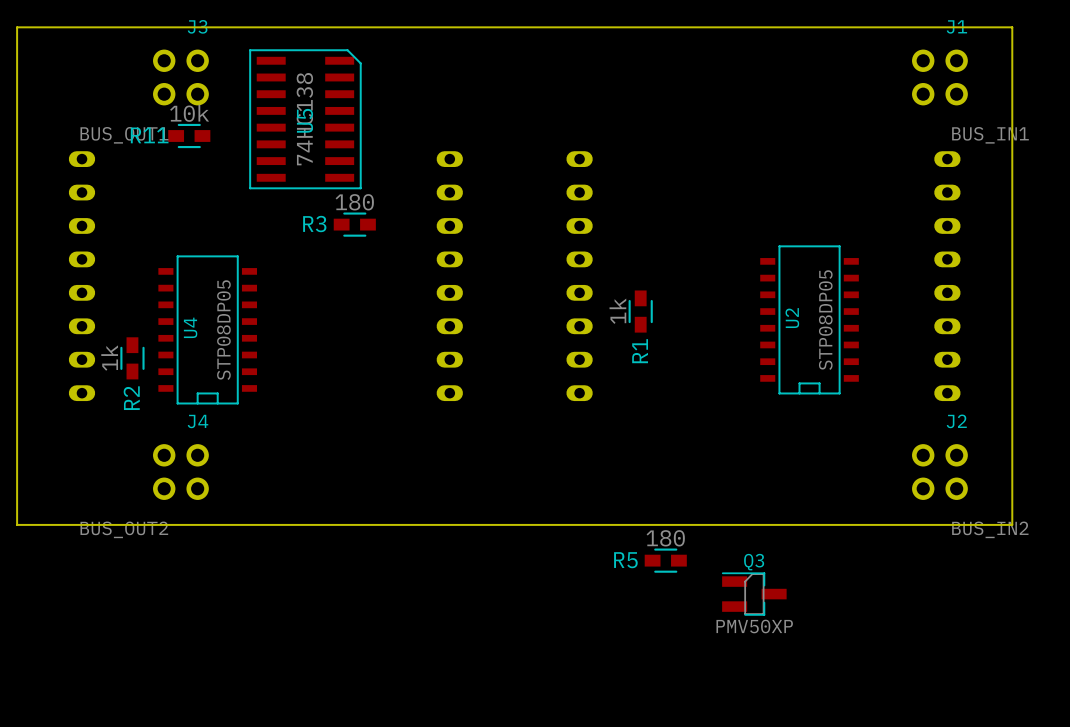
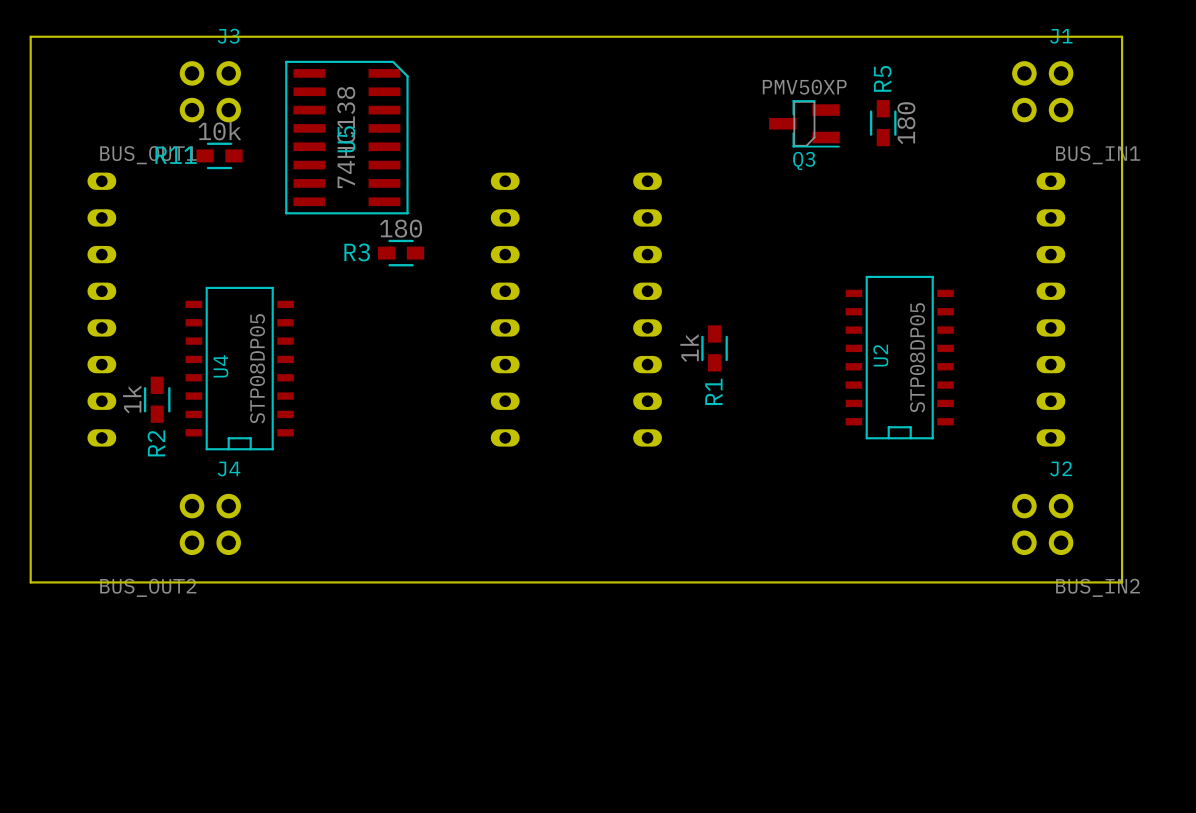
R5 rotation: 0° (665, 560) -> 90° clockwise (883, 123)
R5 position: (665, 560) -> (883, 123)
Q3 rotation: 0° (754, 594) -> 180° (804, 123)
Q3 position: (754, 594) -> (804, 123)

